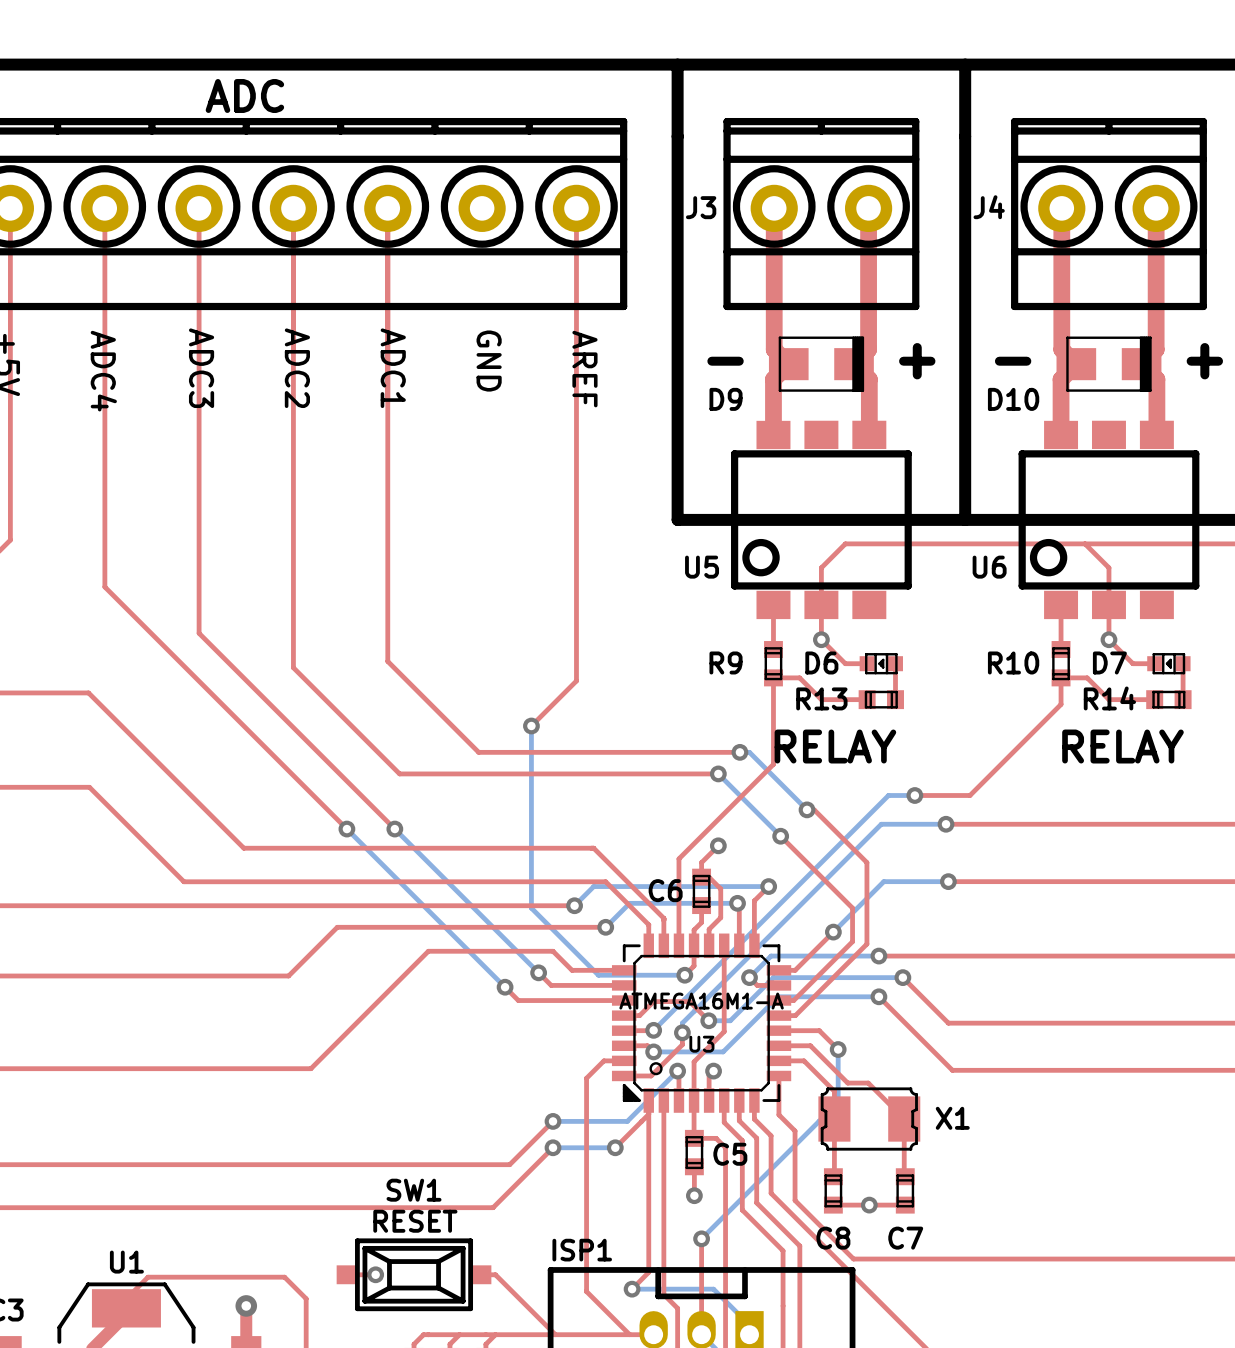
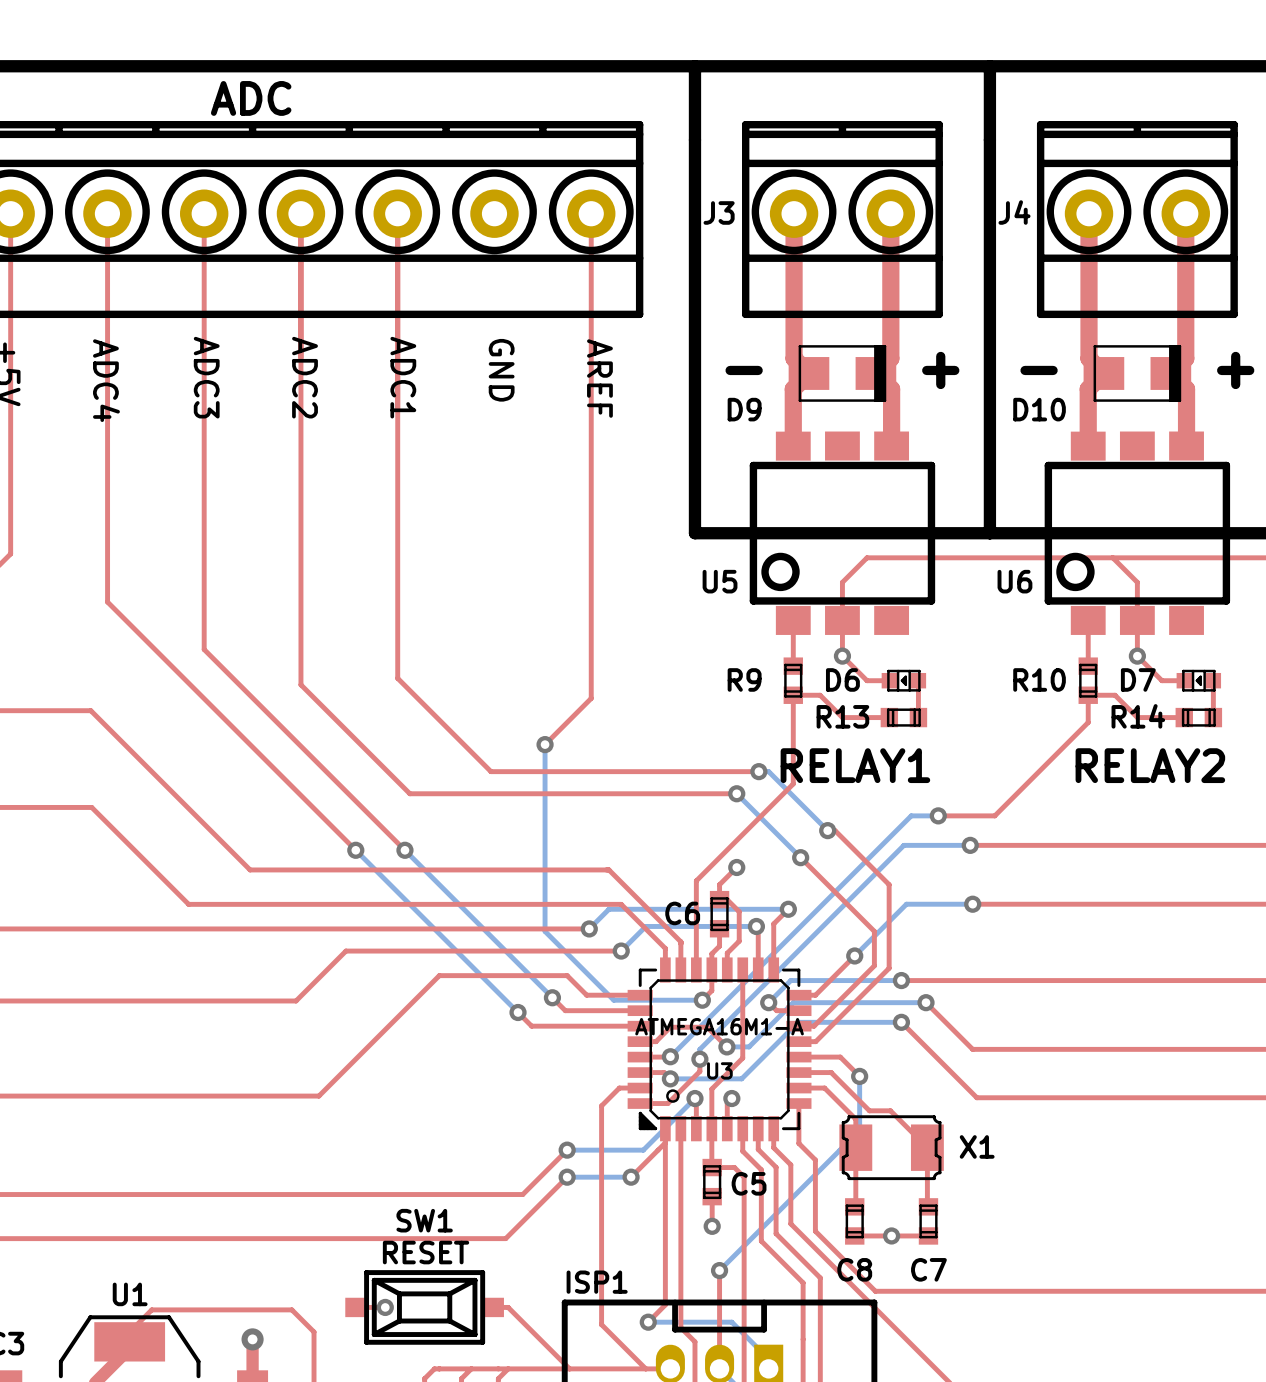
J3 value: RELAY (835, 746) -> RELAY1 (855, 765)
J4 value: RELAY (1122, 746) -> RELAY2 (1150, 765)

